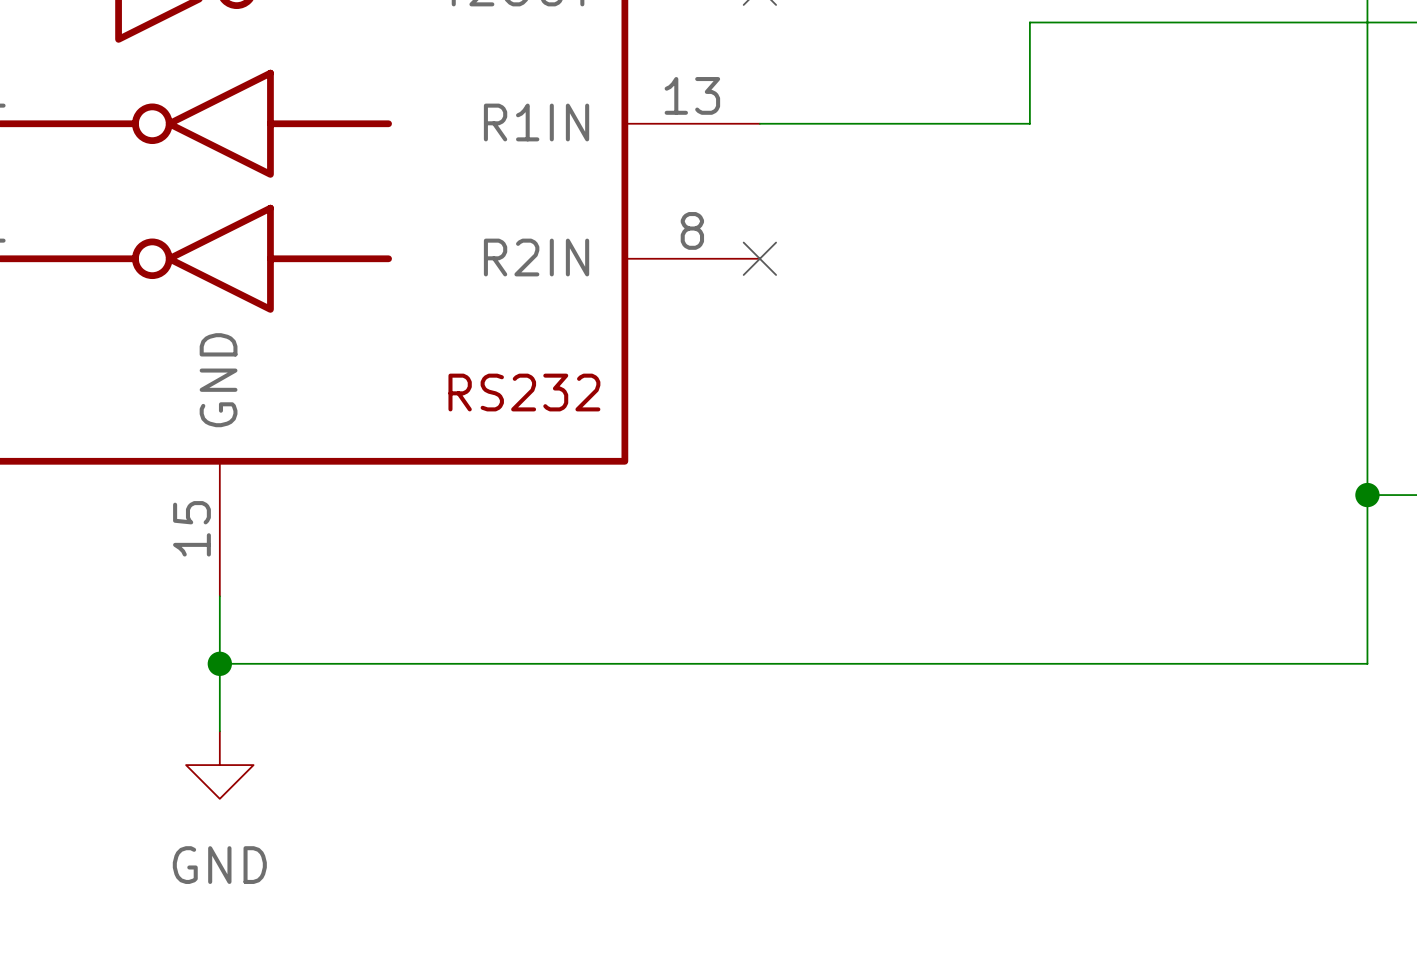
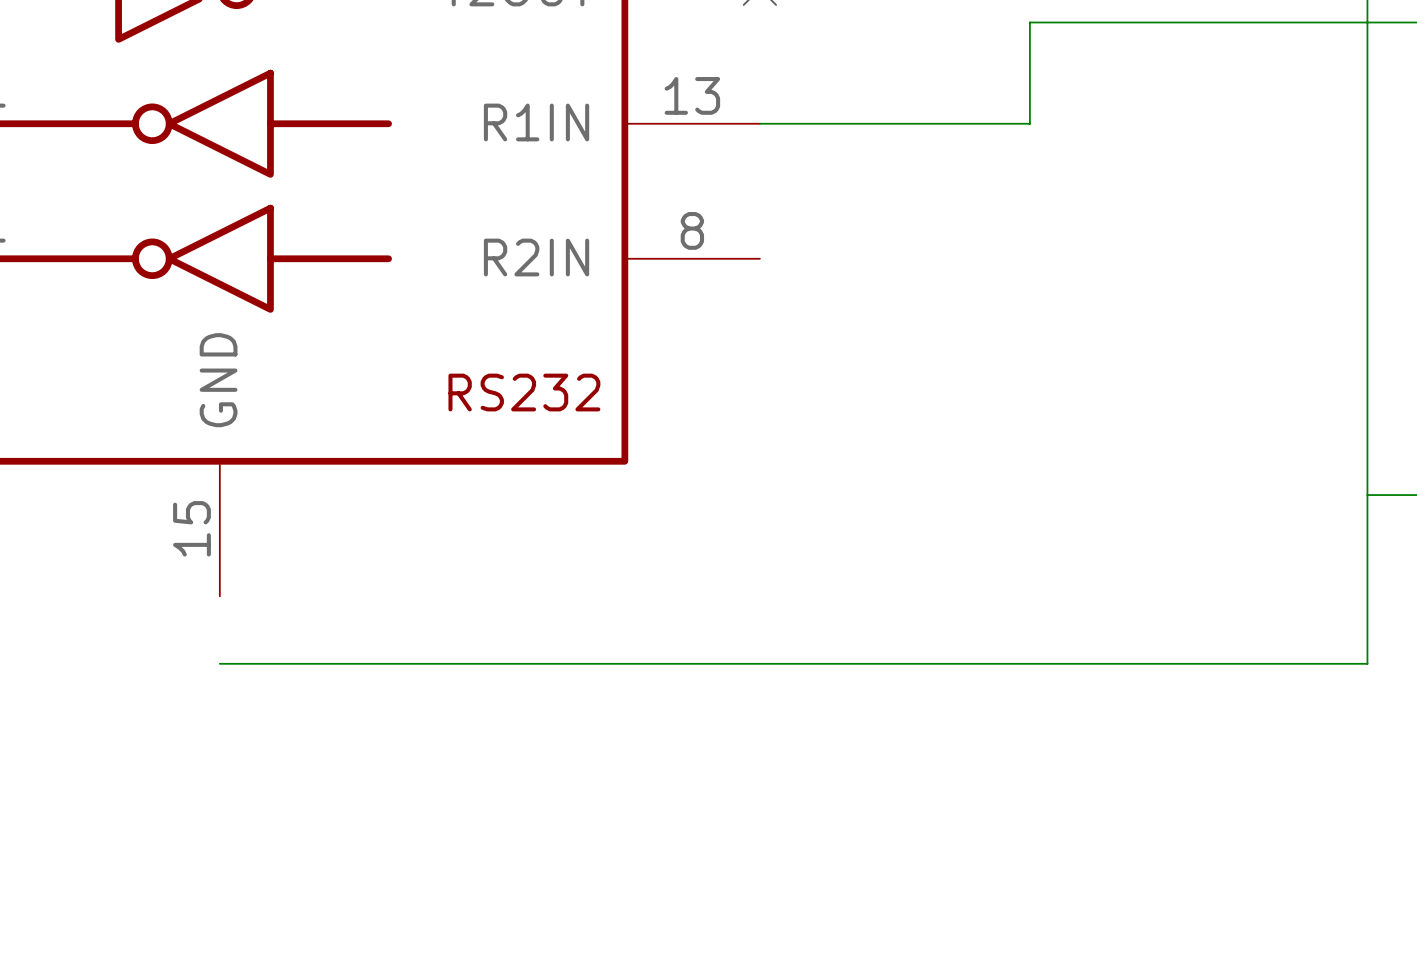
no-connect mark: (759, 258) -> none
junction: (1367, 495) -> none
wire: (219, 596) (219, 731) -> none
junction: (219, 663) -> none
power symbol: GND (219, 765) -> none

